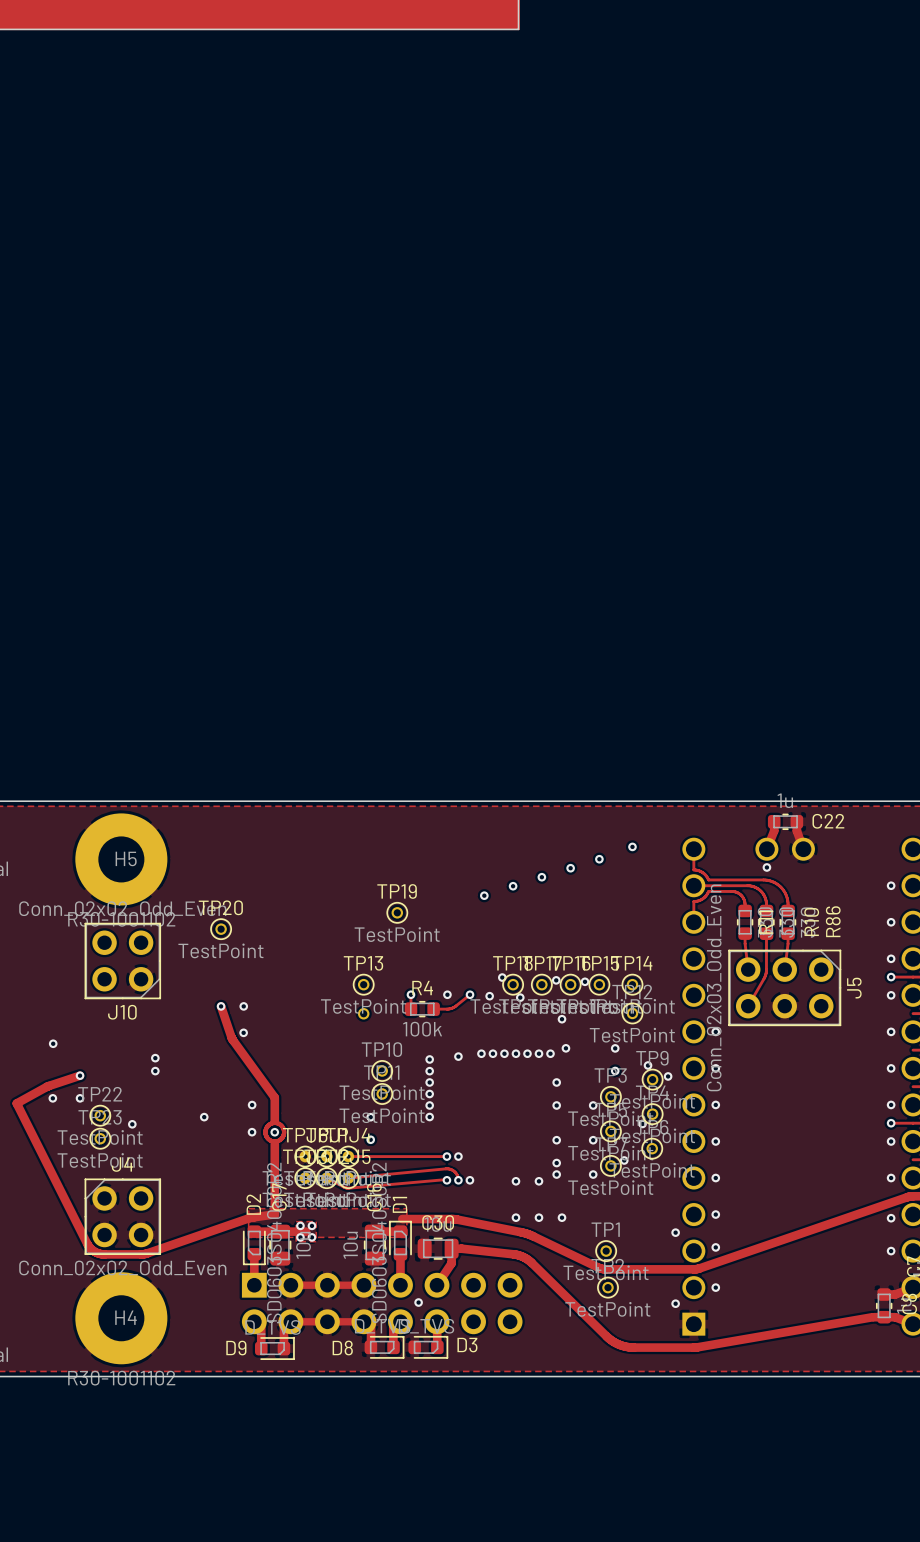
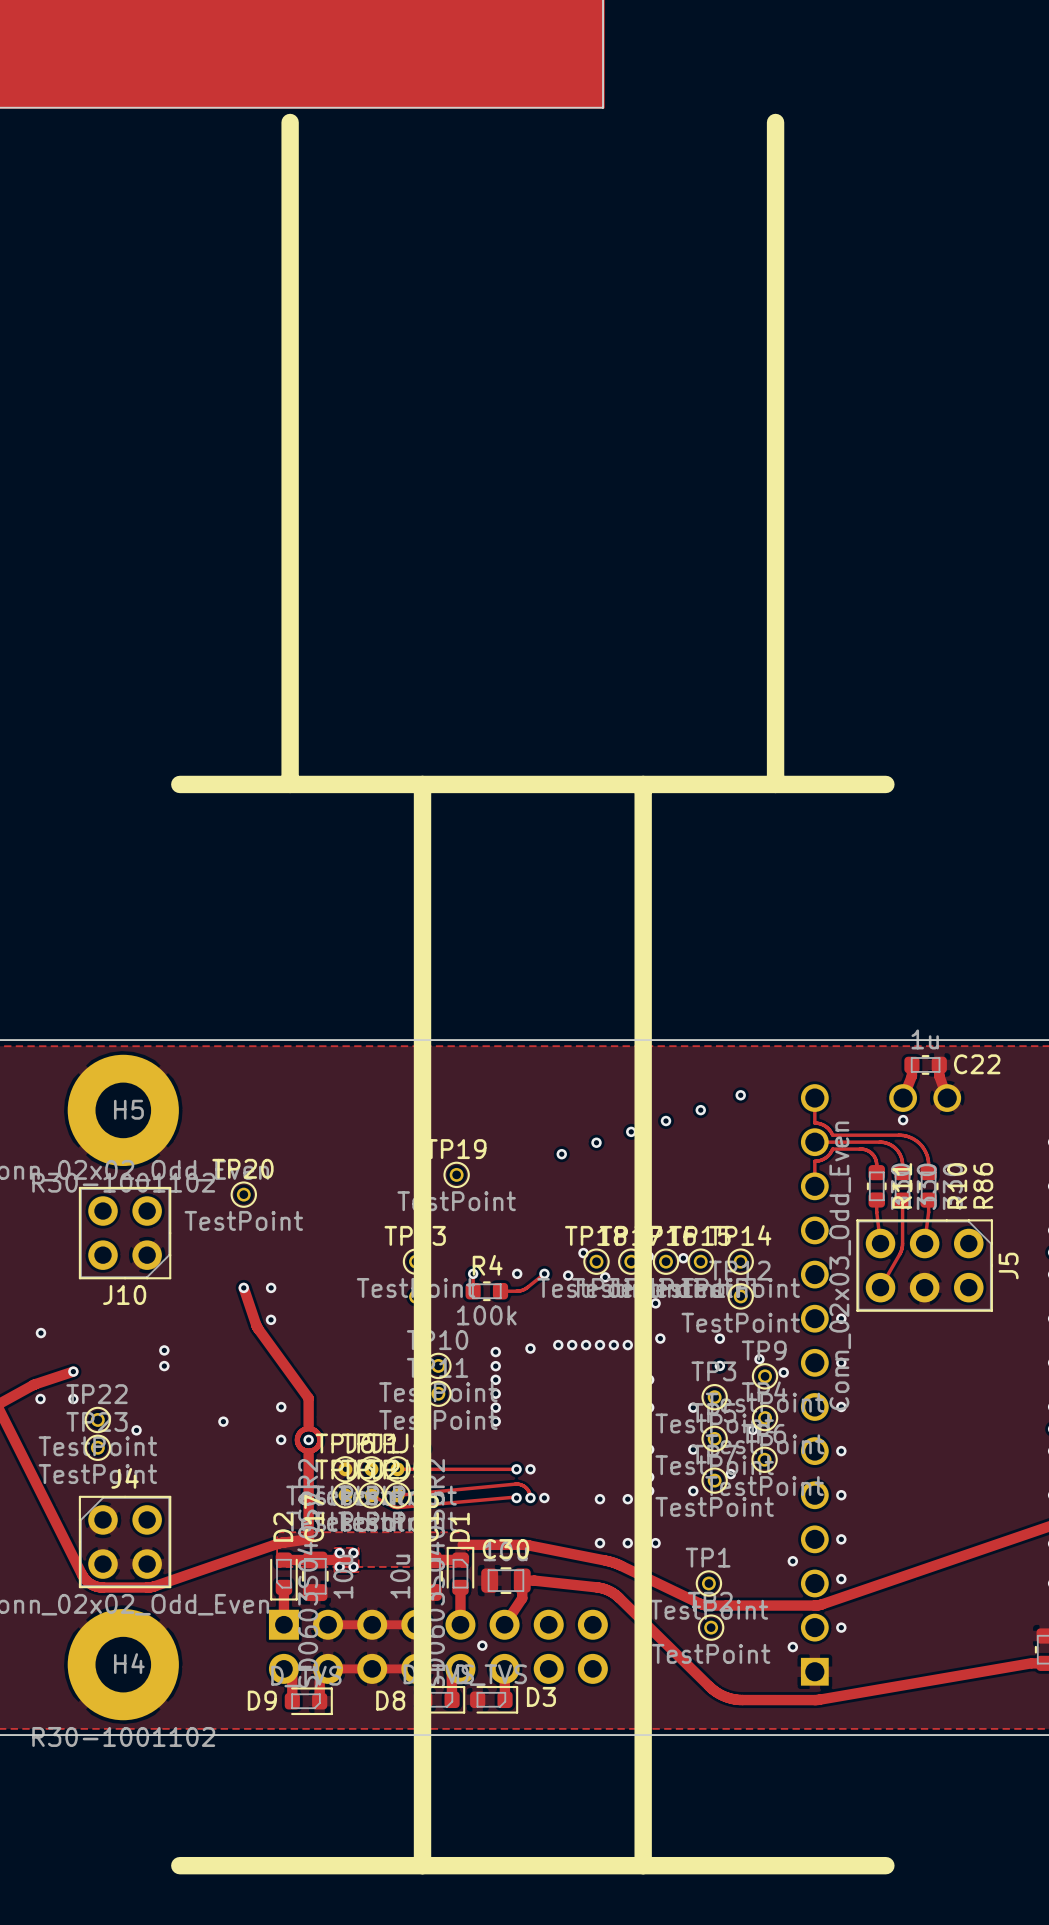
line: none -> (290, 122) (290, 784)
line: none -> (775, 122) (775, 784)
line: none -> (179, 784) (885, 784)
line: none -> (422, 784) (422, 1865)
line: none -> (643, 784) (643, 1865)
line: none -> (179, 1865) (885, 1865)

